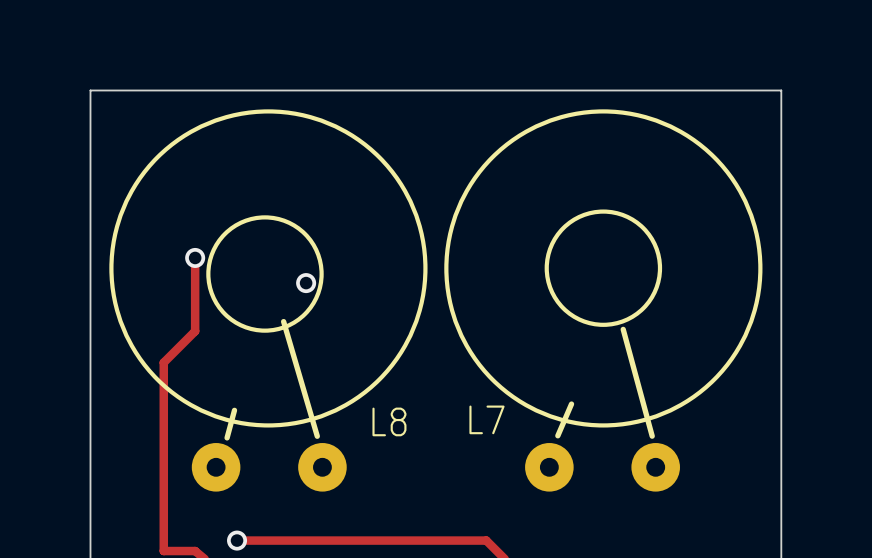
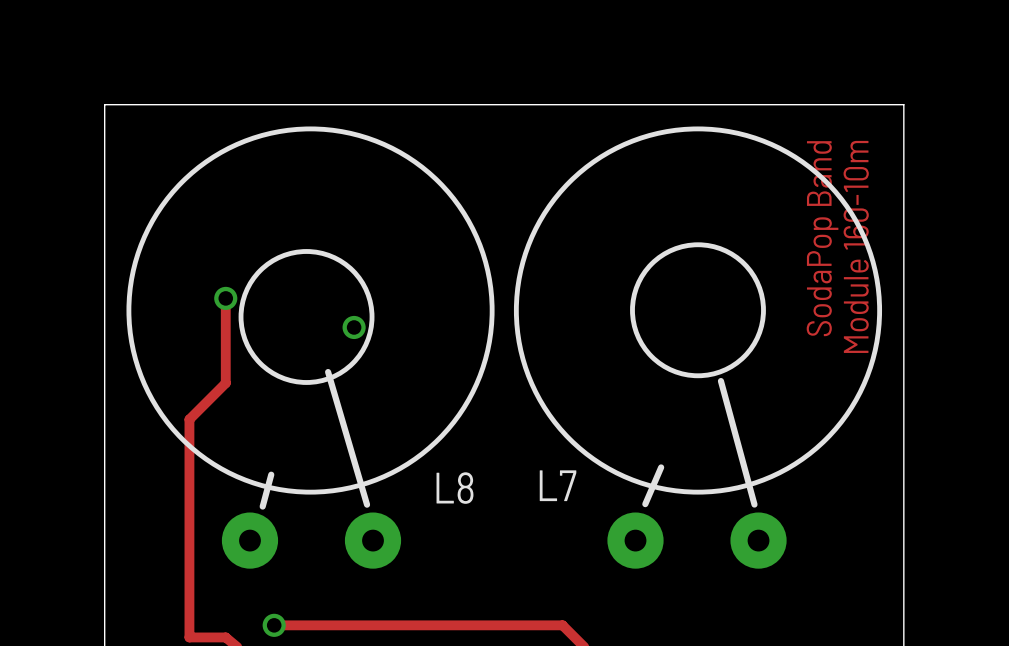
text: none -> SodaPop Band (822, 238)
text: none -> Module 160-10m (856, 246)

